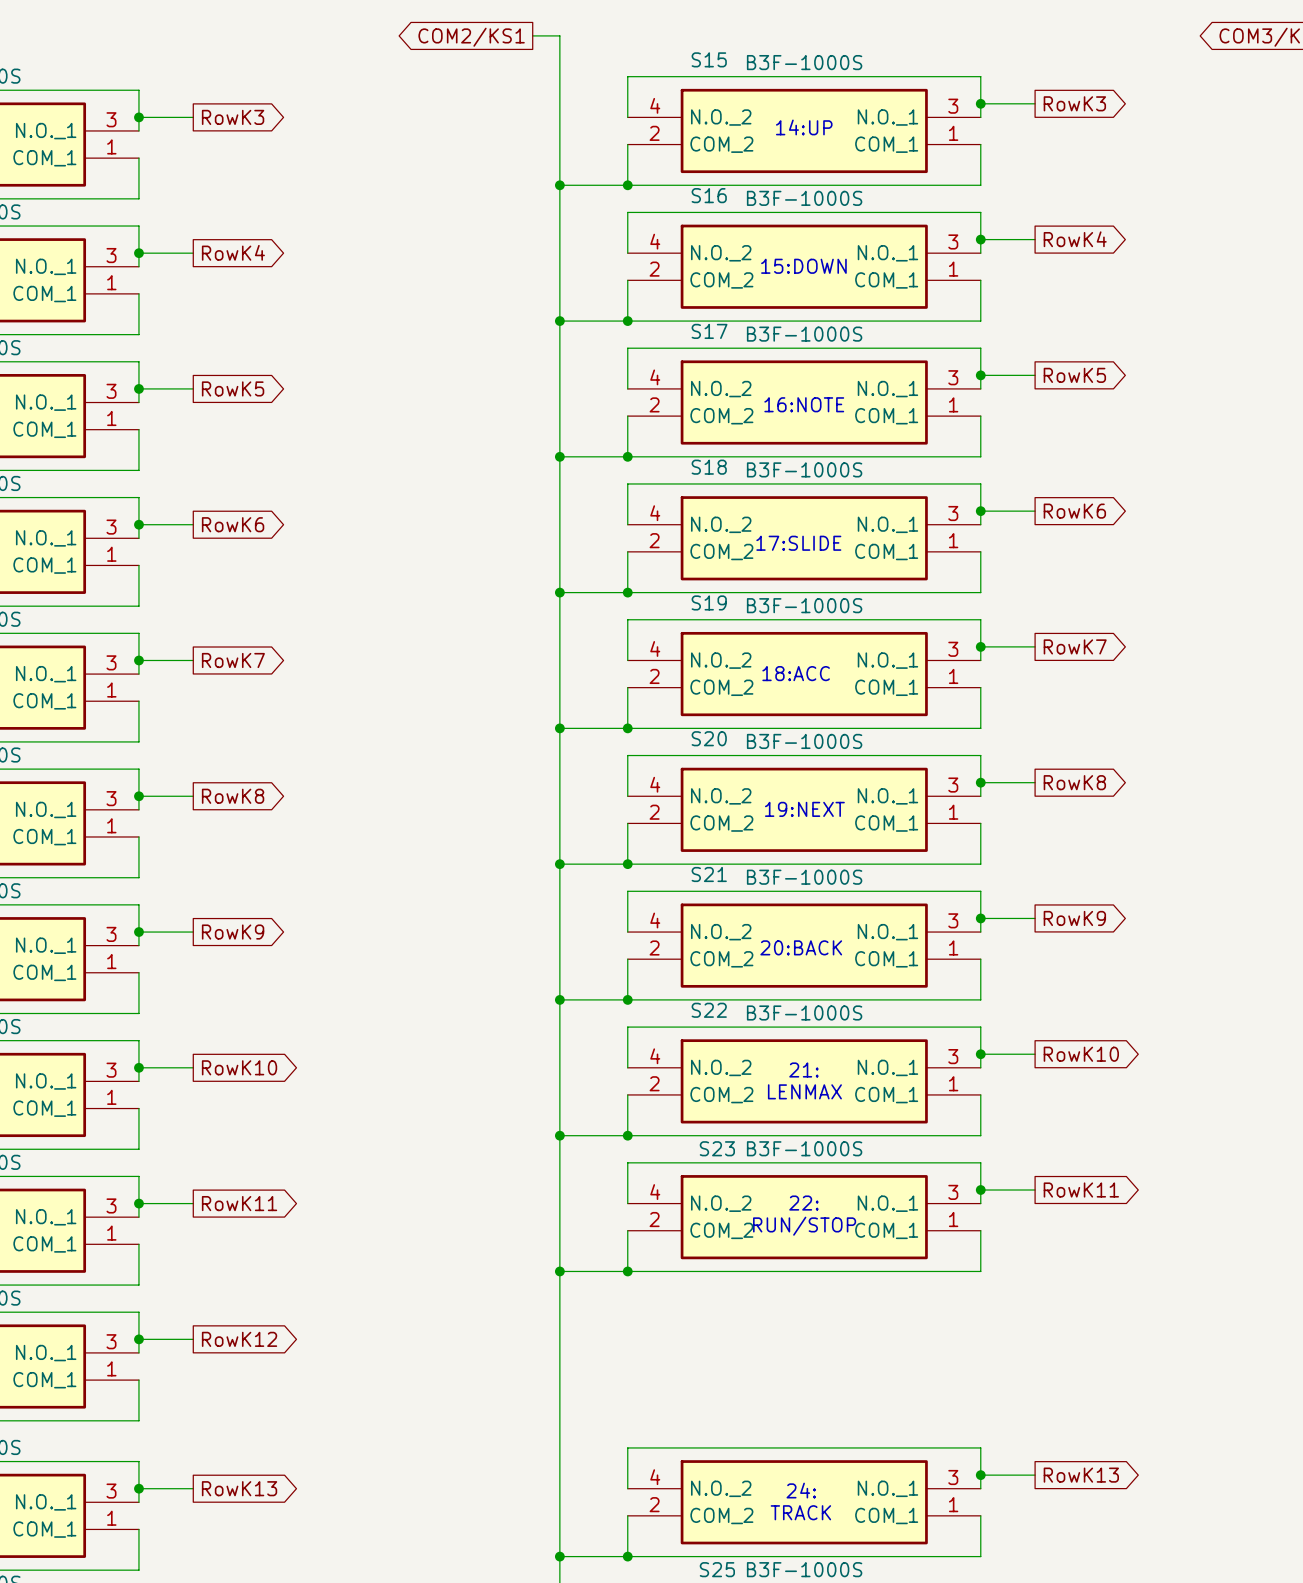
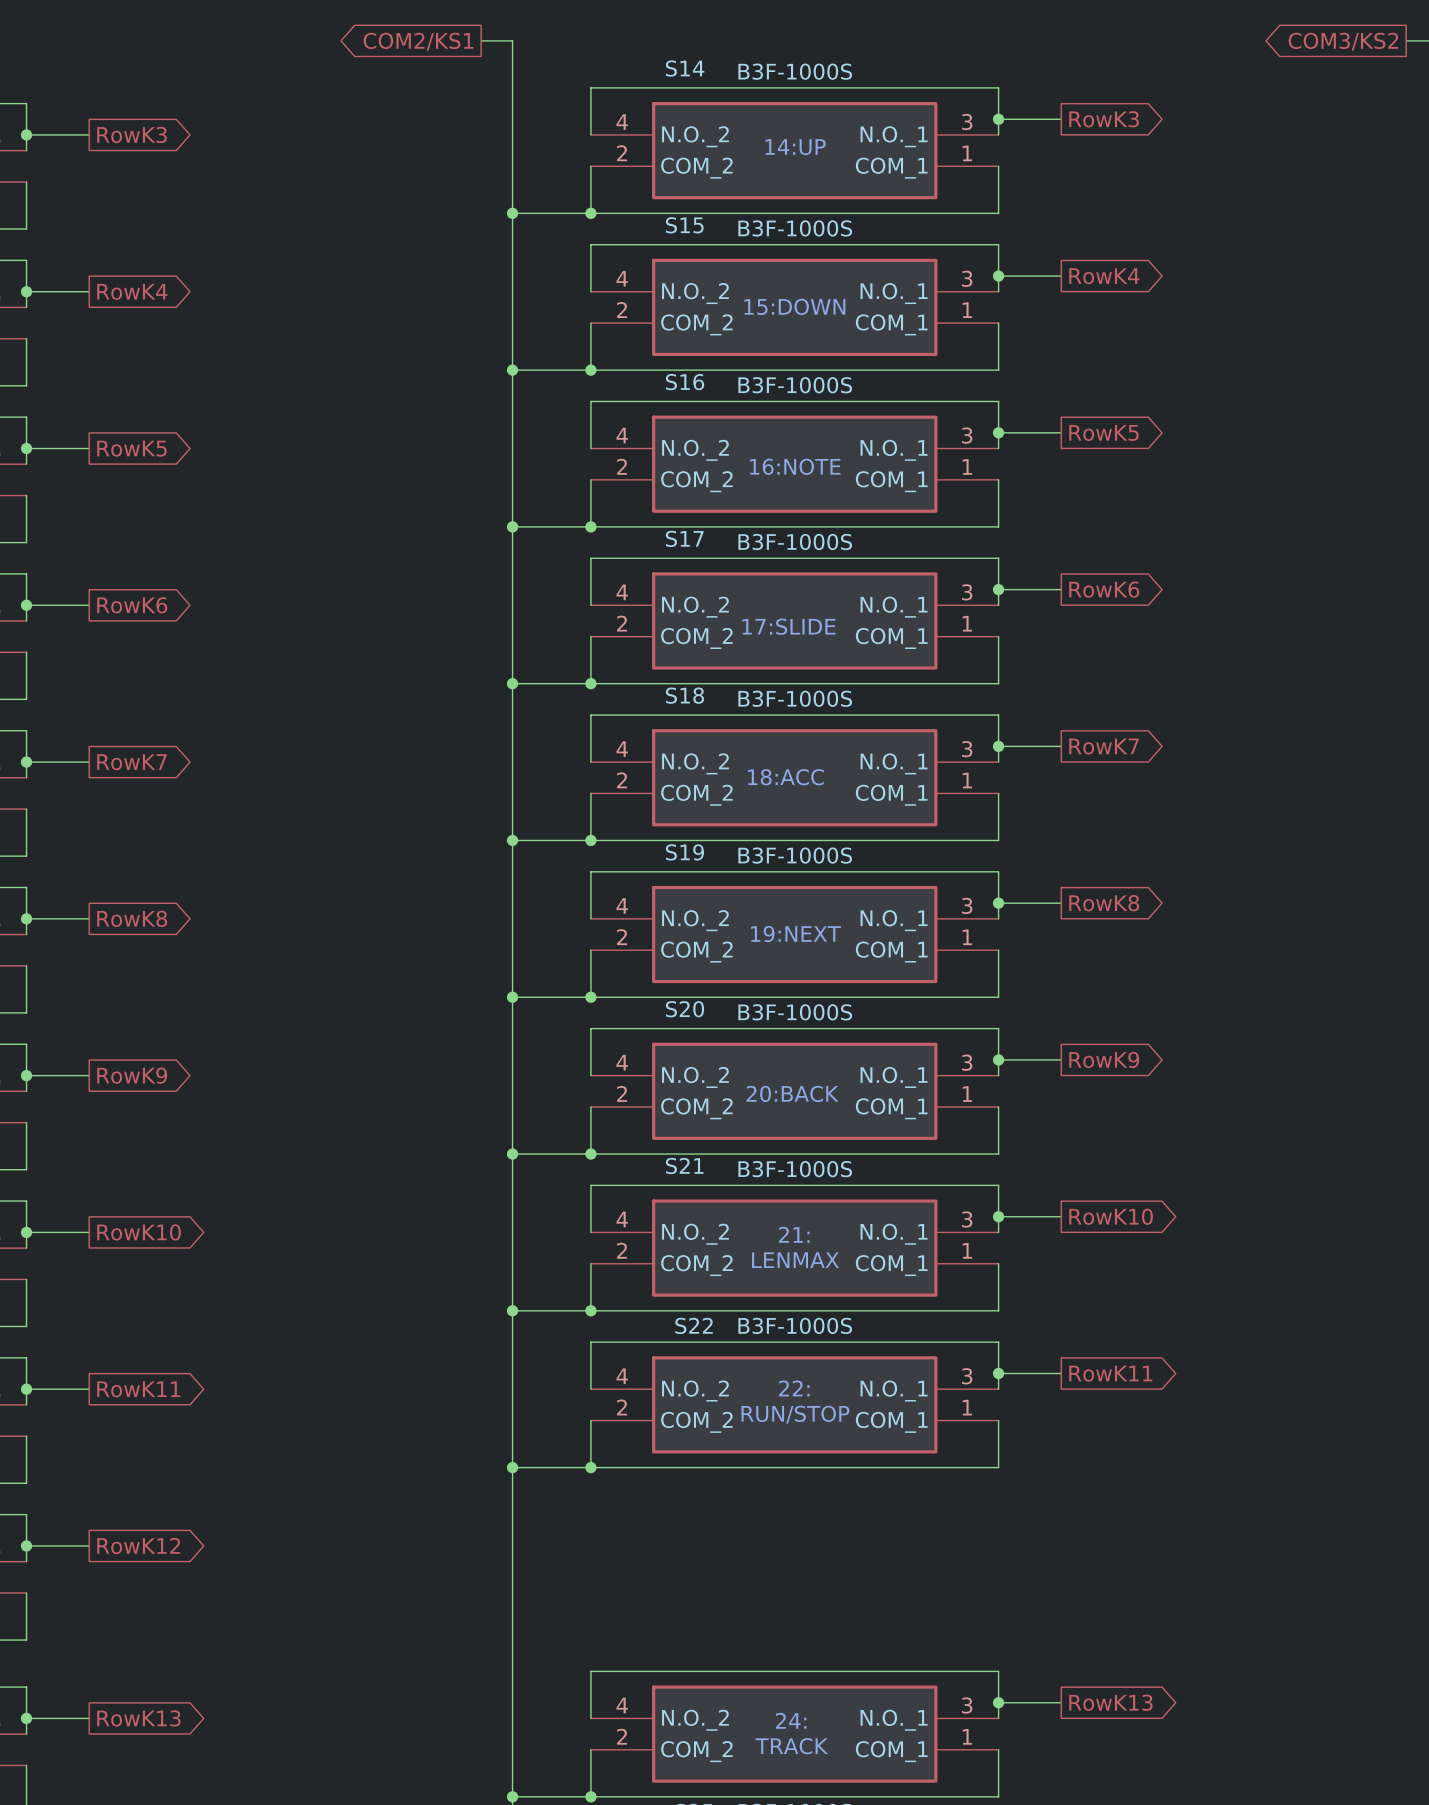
S15 name: S15 (709, 59) -> S14 (685, 68)
S16 name: S16 (709, 195) -> S15 (684, 225)
S17 name: S17 (709, 331) -> S16 (685, 382)
S18 name: S18 (709, 467) -> S17 (684, 538)
S19 name: S19 (709, 602) -> S18 (684, 695)
S20 name: S20 (709, 738) -> S19 (684, 852)
S21 name: S21 (709, 874) -> S20 (685, 1009)
S22 name: S22 (709, 1010) -> S21 (684, 1165)
S23 name: S23 (717, 1148) -> S22 (694, 1325)

